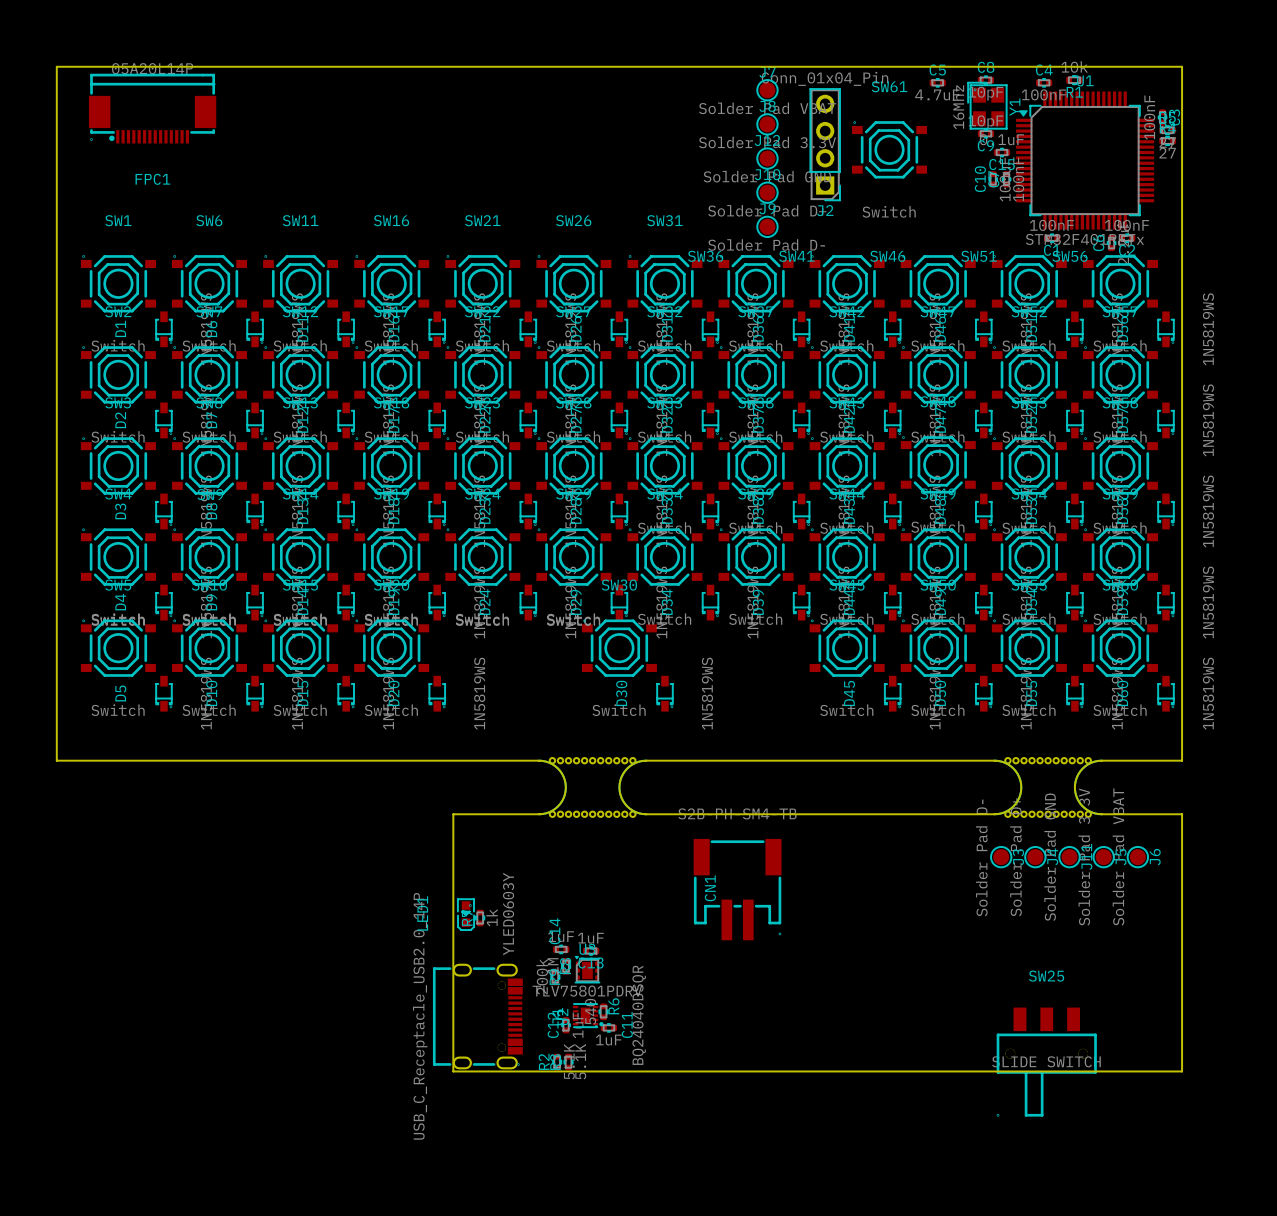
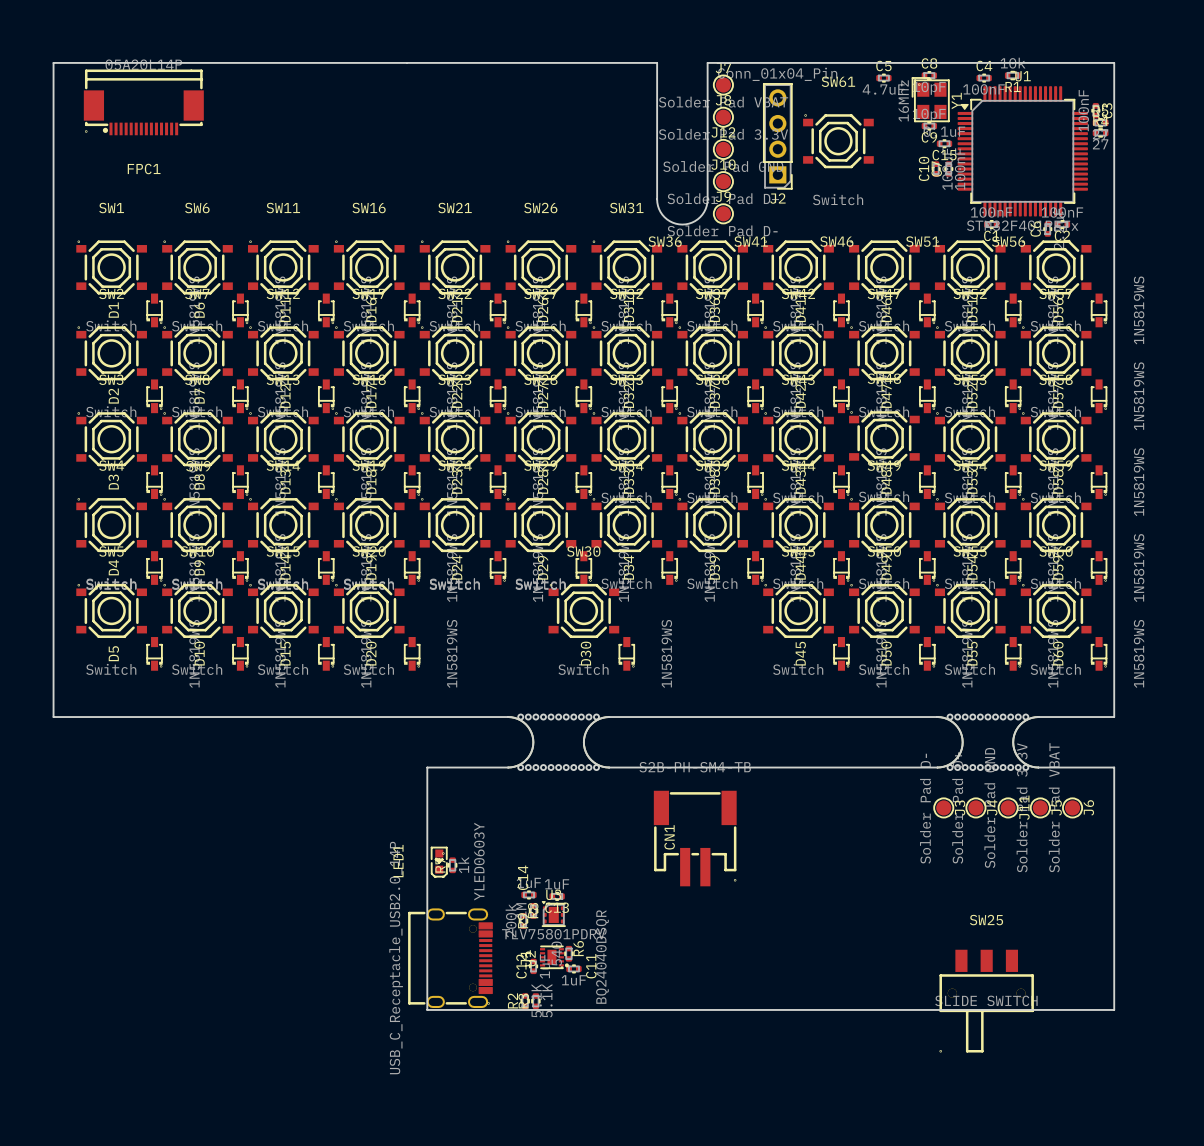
board edge: (697, 66) (750, 66) -> (657, 62) (657, 202) (660, 211) (667, 219) (682, 224) (697, 219) (704, 211) (707, 202) (707, 62)

